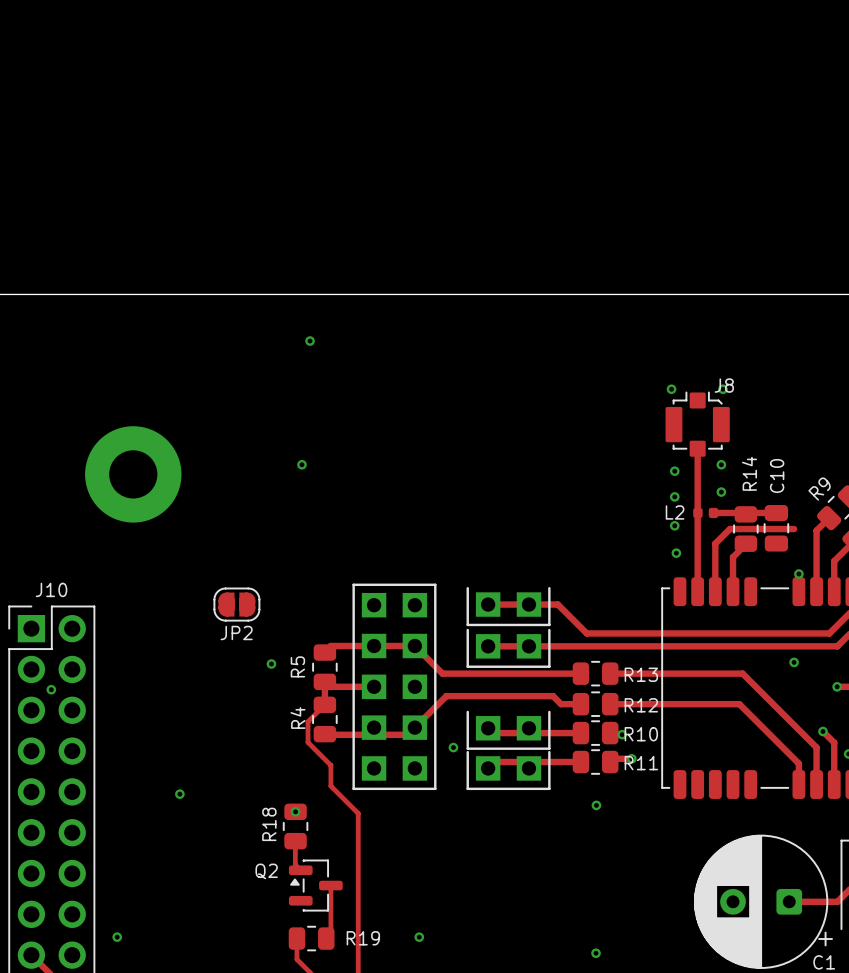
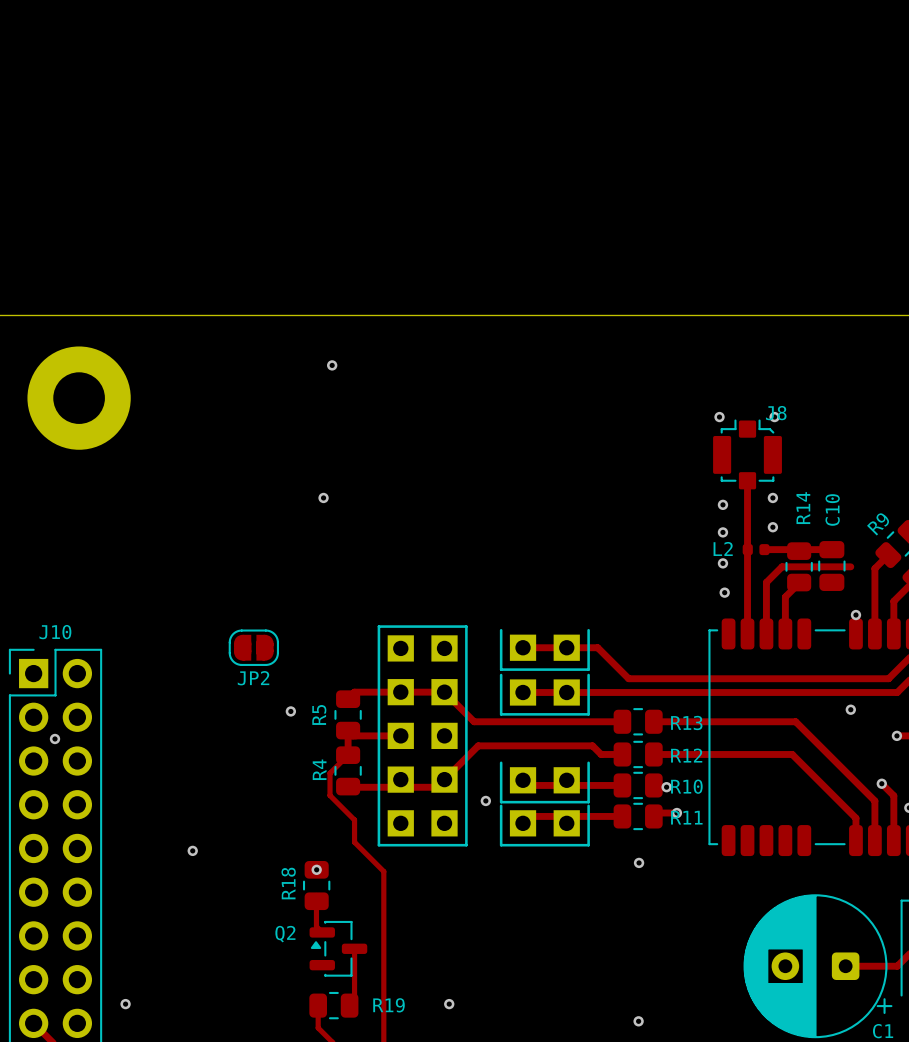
part position: (133, 474) -> (79, 398)

